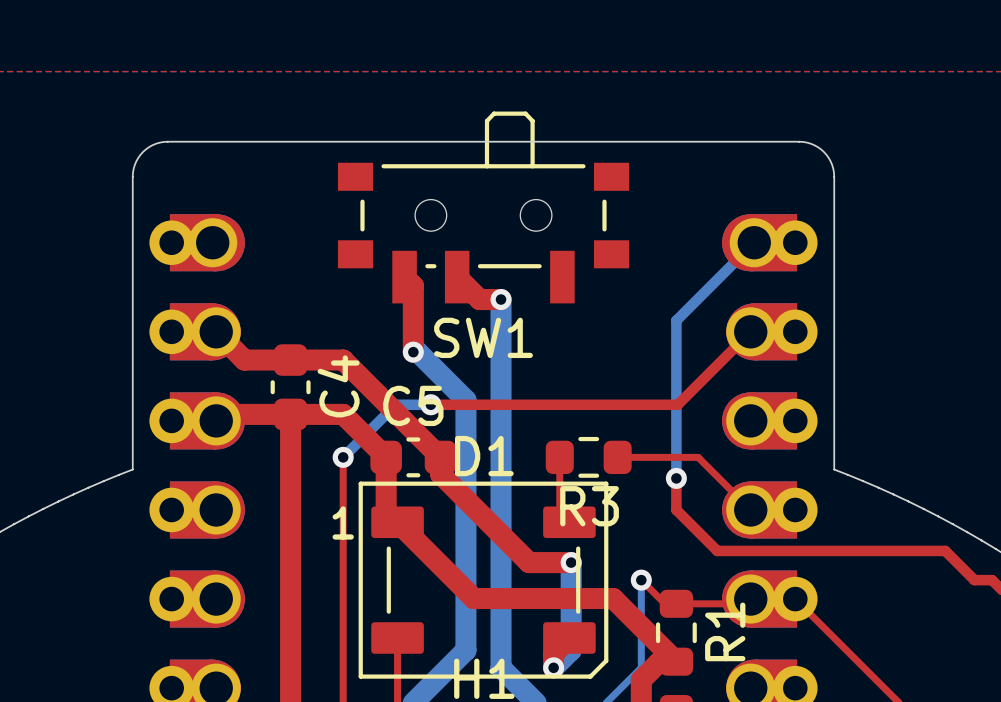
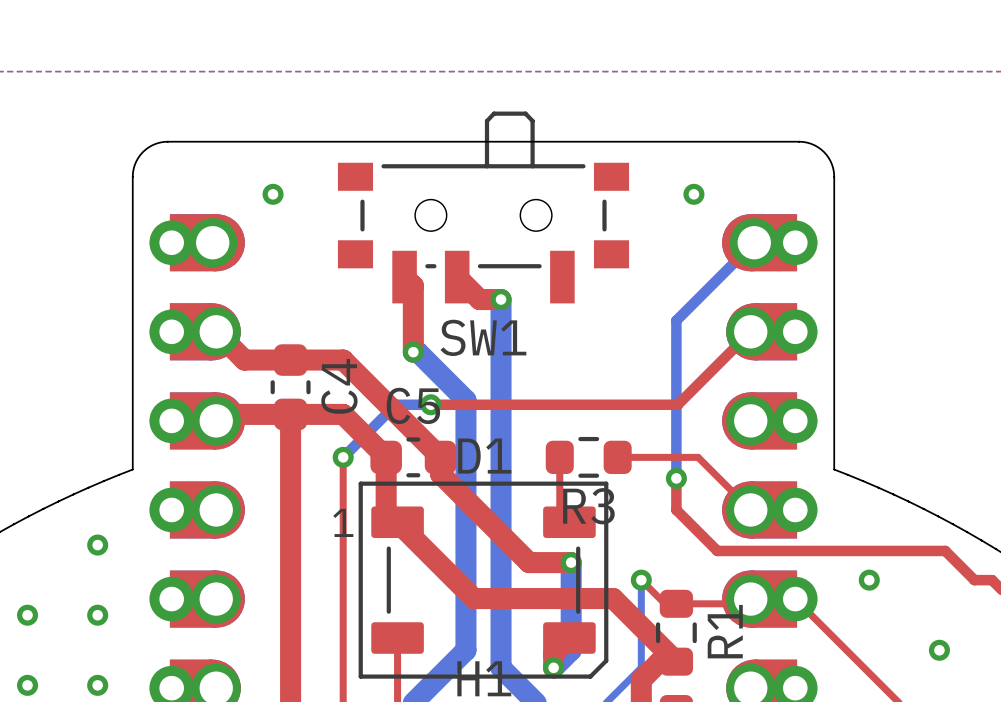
via: none -> (273, 194)
via: none -> (693, 194)
via: none -> (97, 545)
via: none -> (869, 580)
via: none -> (27, 615)
via: none -> (97, 615)
via: none -> (939, 650)
via: none -> (27, 685)
via: none -> (97, 685)

